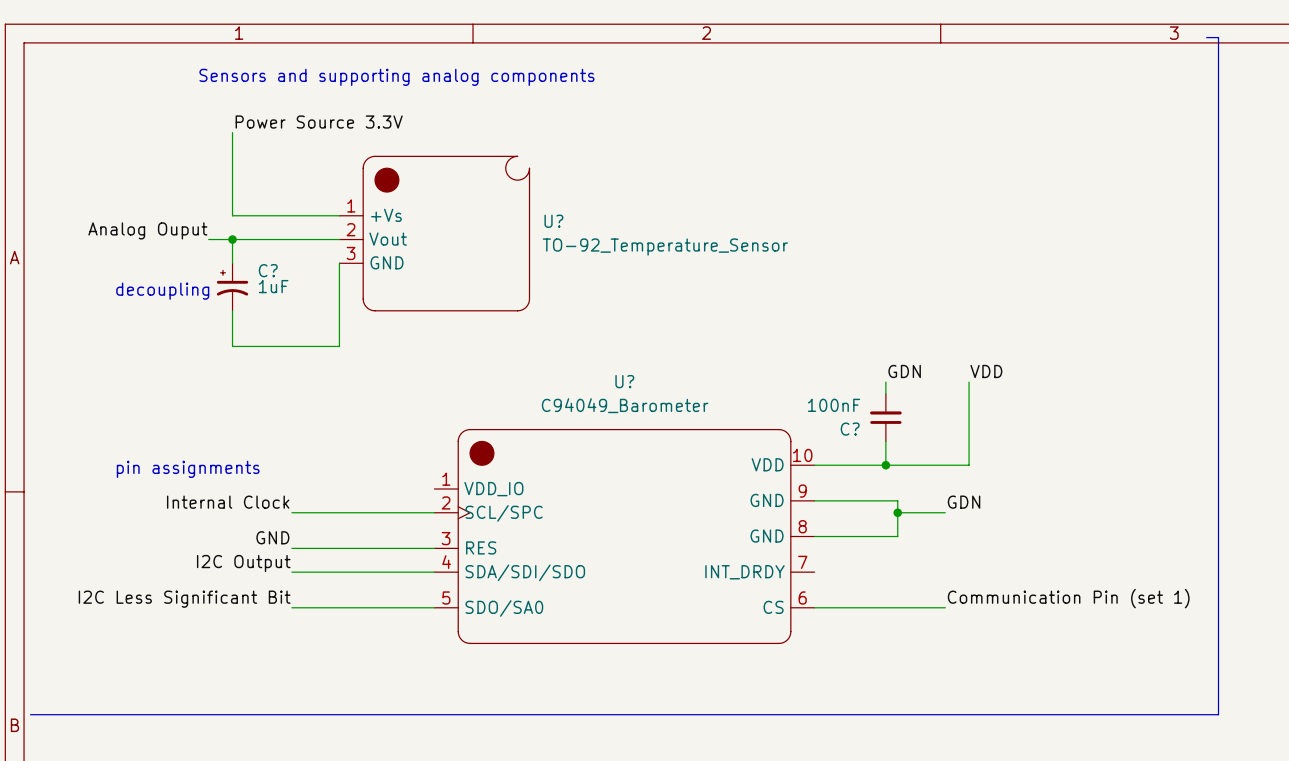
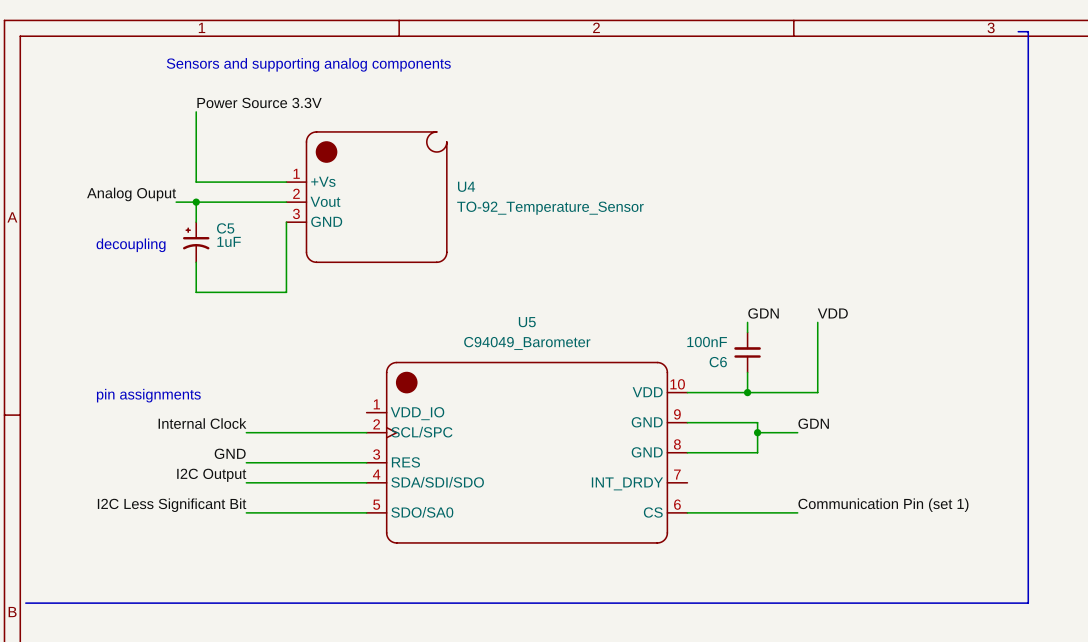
U? name: U? (553, 221) -> U4 (466, 186)
C? name: C? (268, 270) -> C5 (225, 228)
U? name: U? (624, 381) -> U5 (527, 322)
C? name: C? (850, 429) -> C6 (718, 362)

